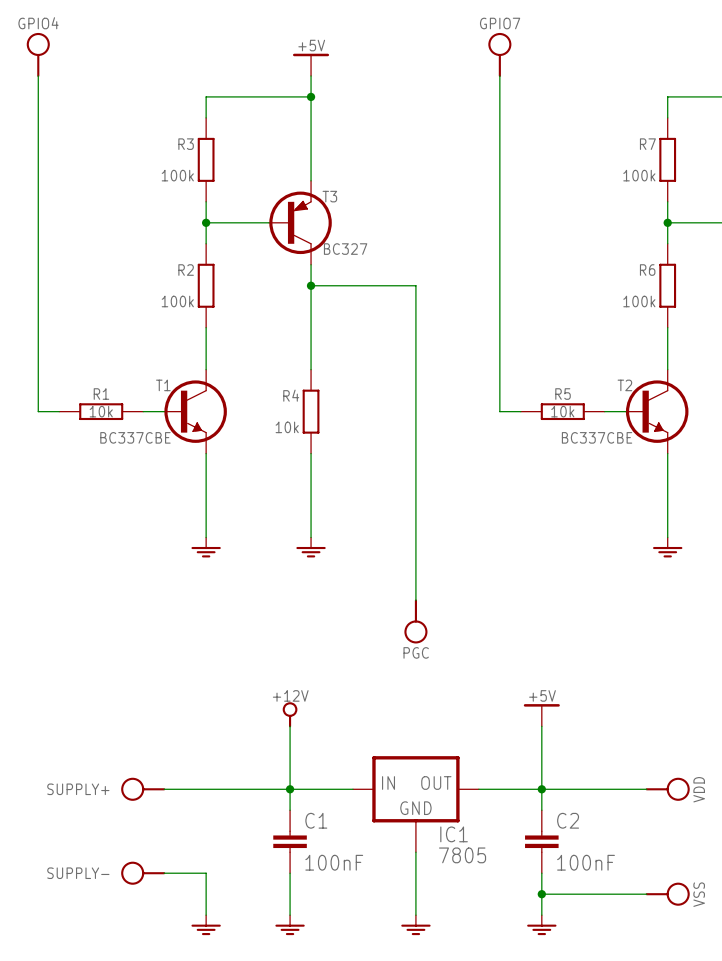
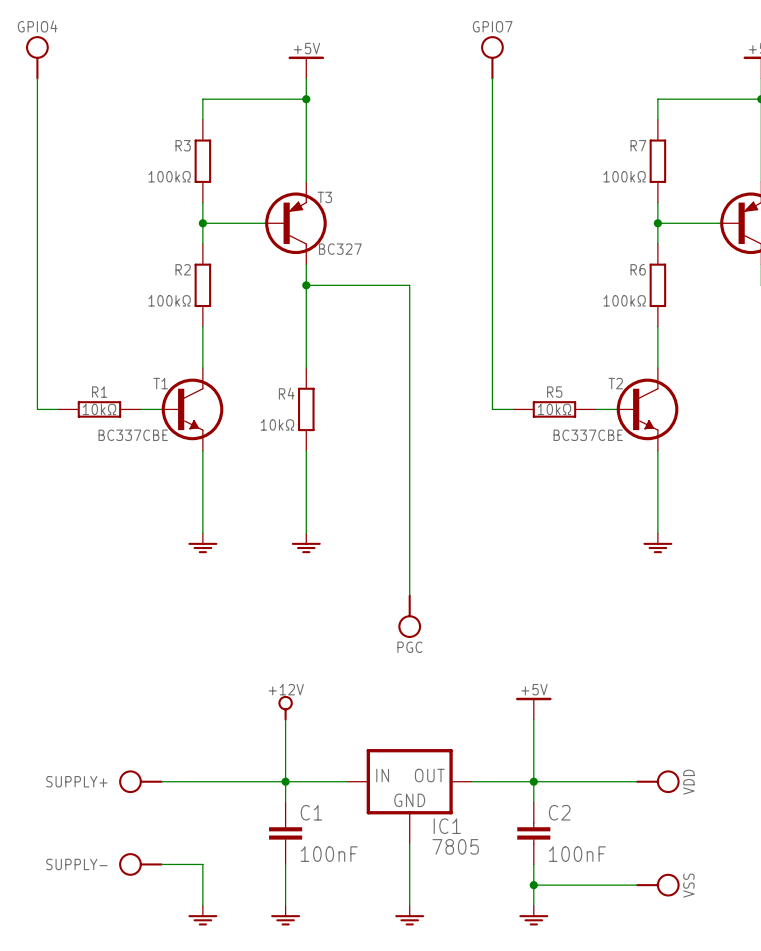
R3 value: 100k (177, 175) -> 100kΩ (169, 176)
R7 value: 100k (639, 175) -> 100kΩ (624, 176)
R2 value: 100k (177, 301) -> 100kΩ (169, 300)
R6 value: 100k (639, 301) -> 100kΩ (624, 300)
R1 value: 10k (101, 411) -> 10kΩ (99, 409)
R5 value: 10k (562, 411) -> 10kΩ (554, 409)
R4 value: 10k (287, 427) -> 10kΩ (277, 424)

